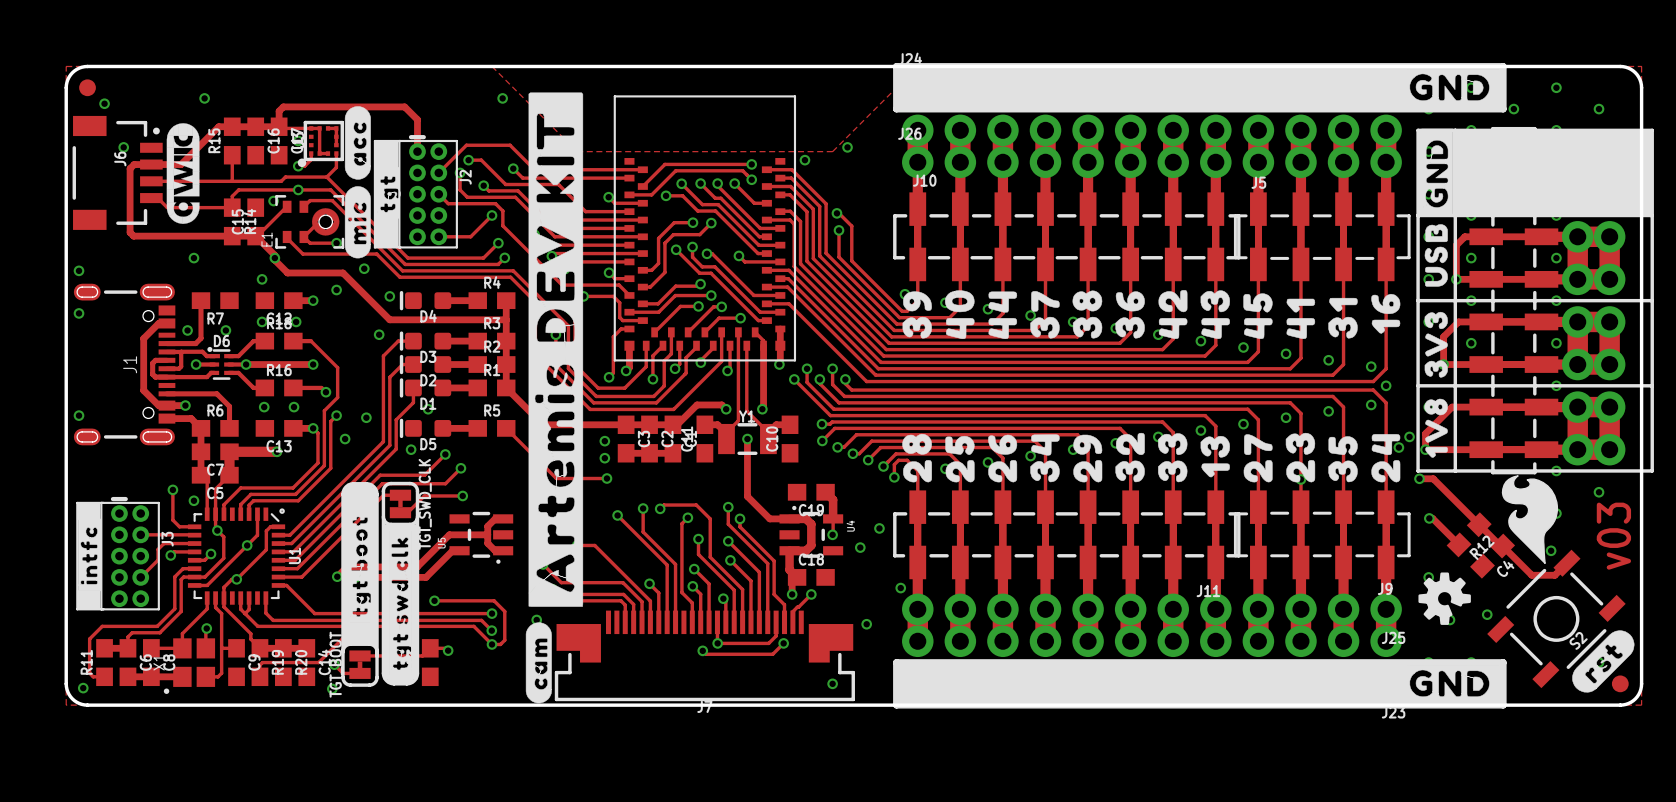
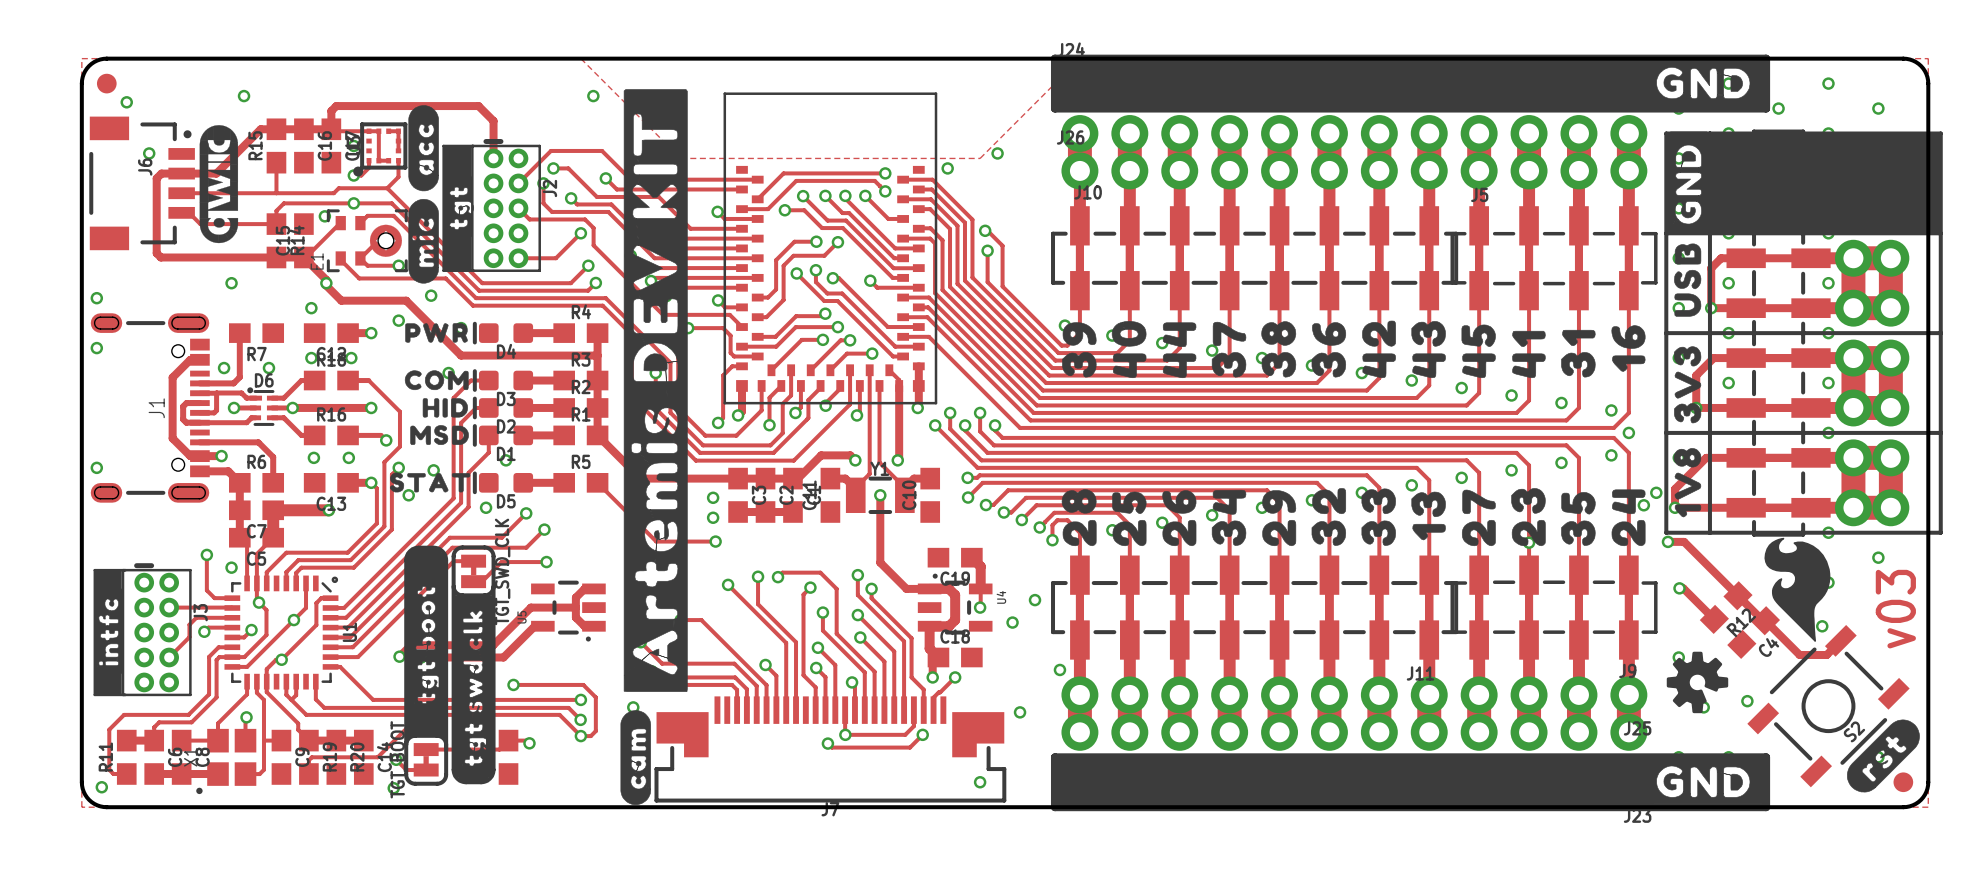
drawing: none -> [405, 323, 468, 343]
drawing: none -> [404, 370, 469, 445]
drawing: none -> [389, 472, 471, 493]

